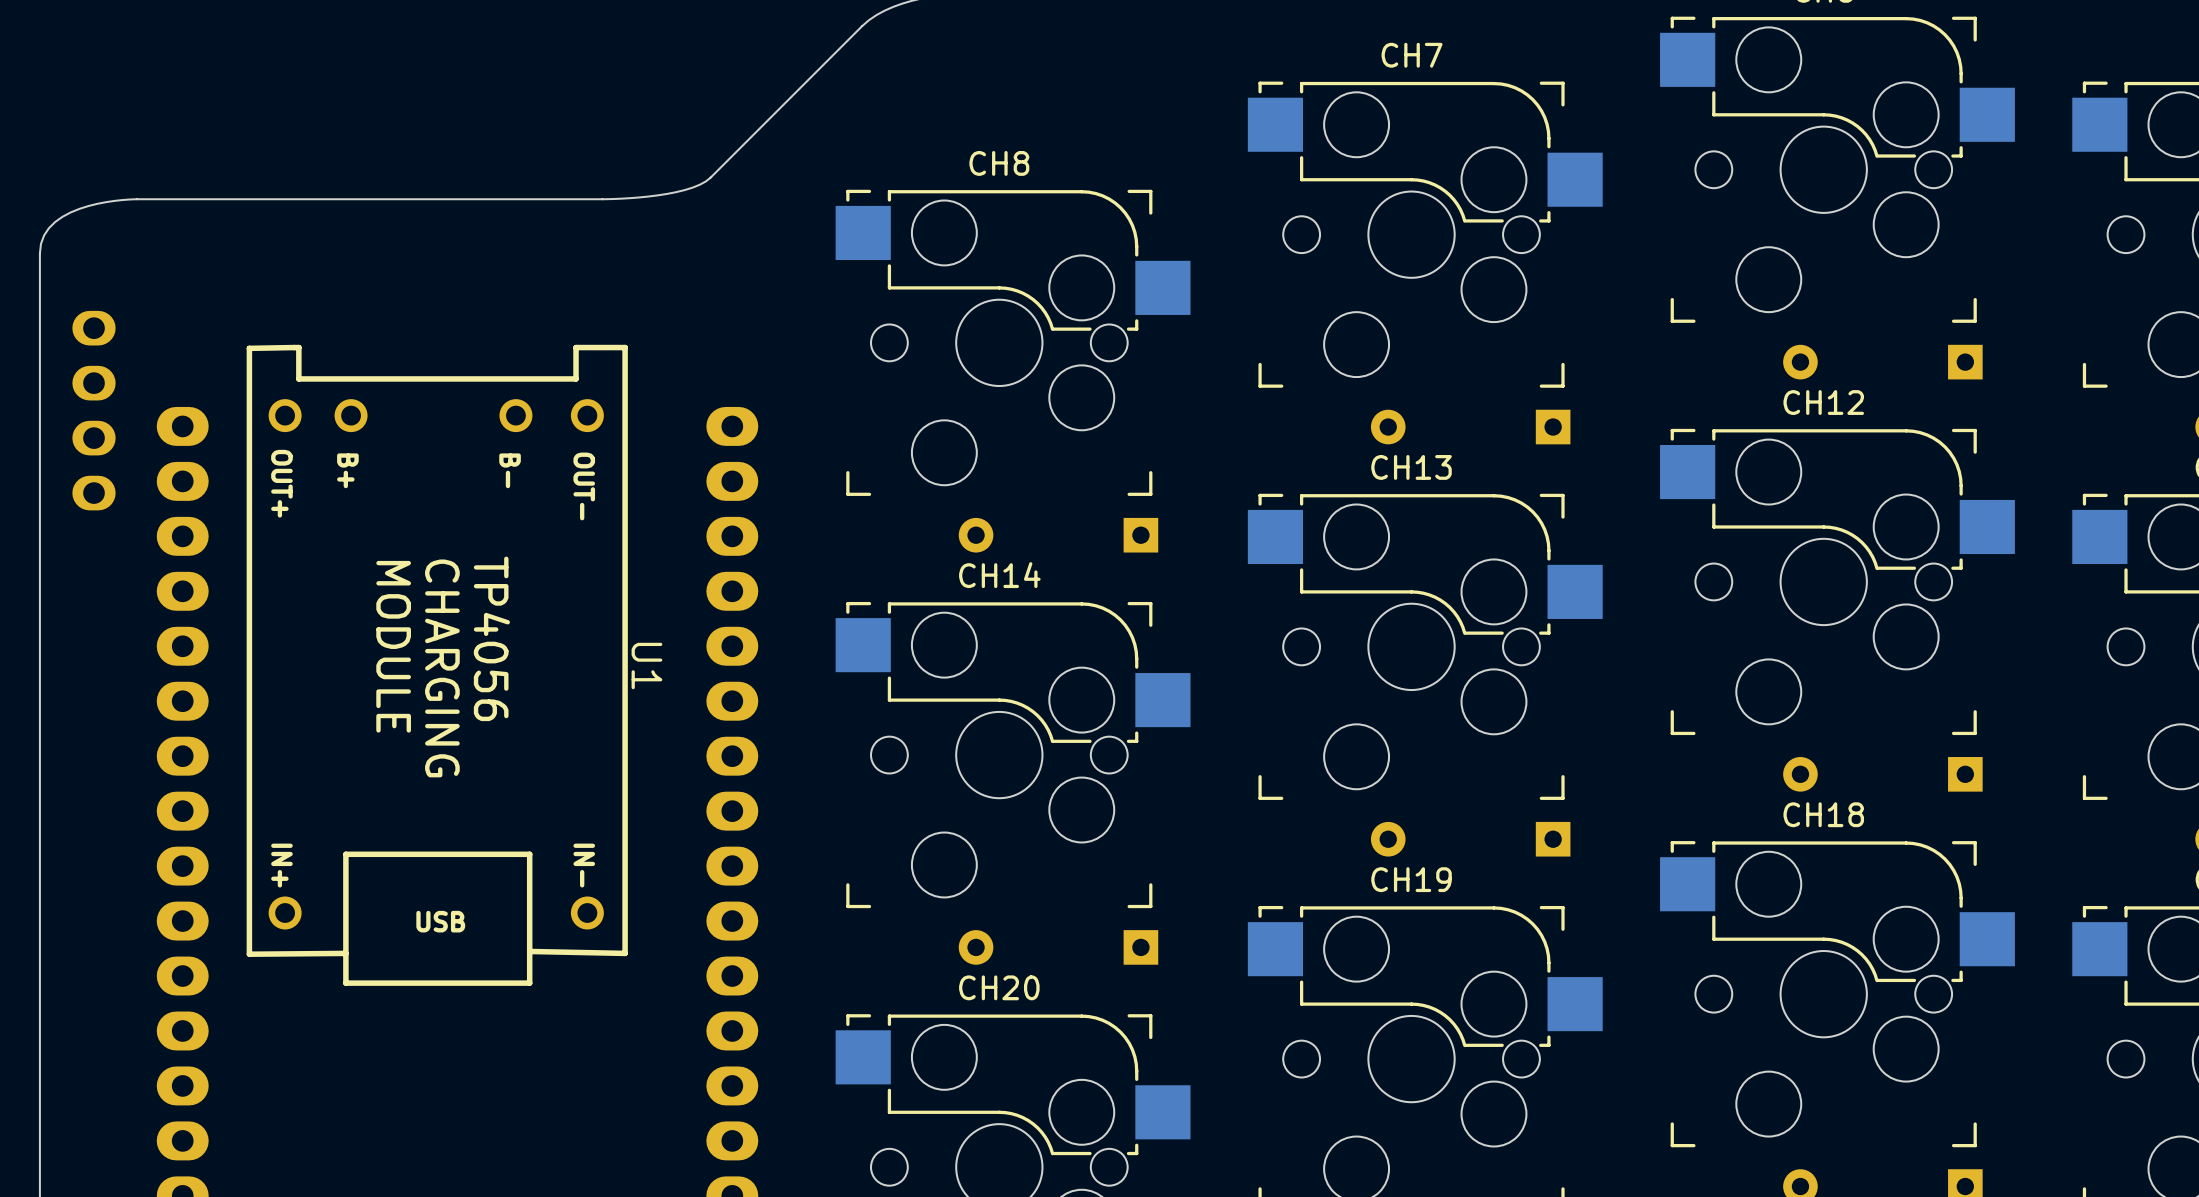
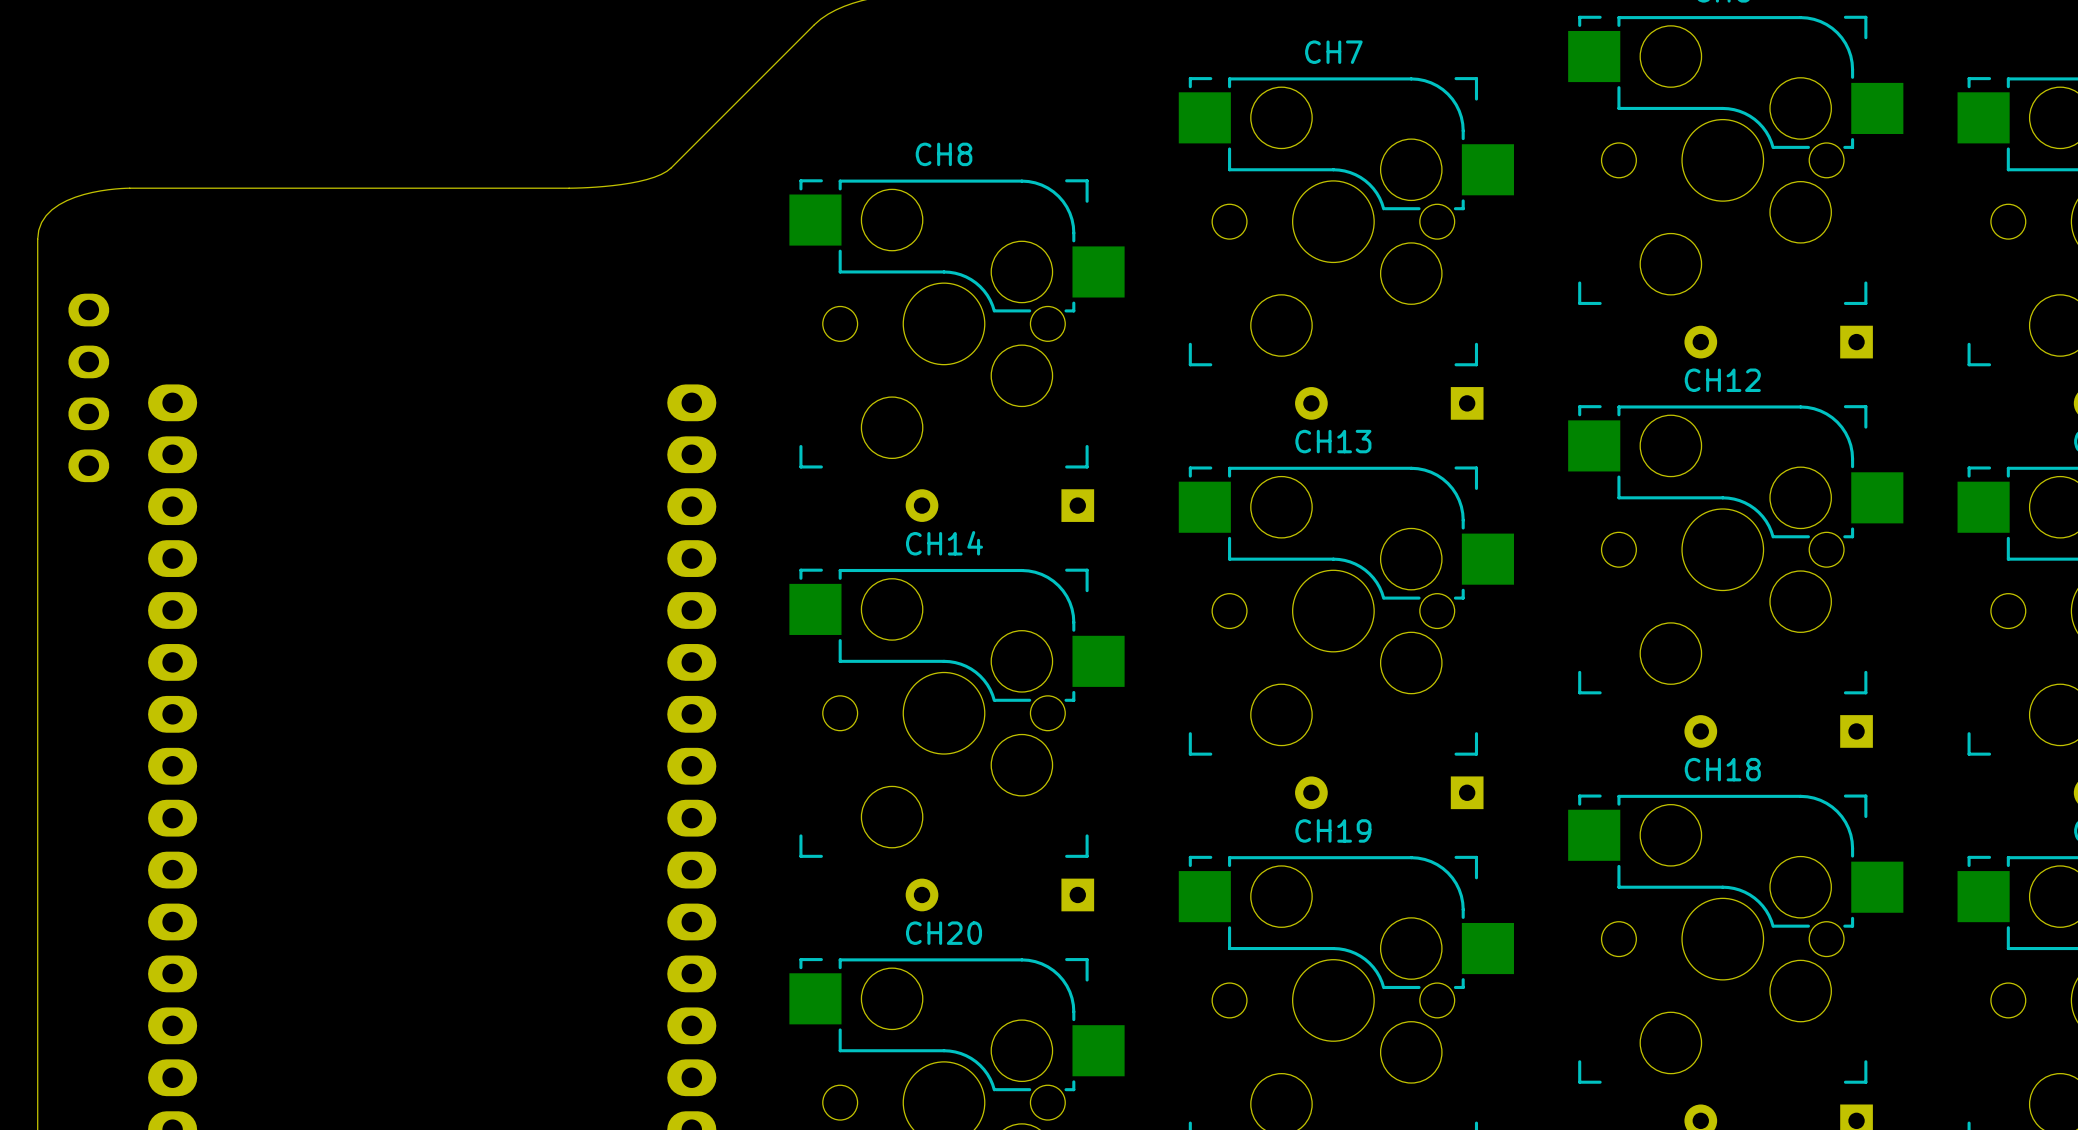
U1: (437, 665) -> none

